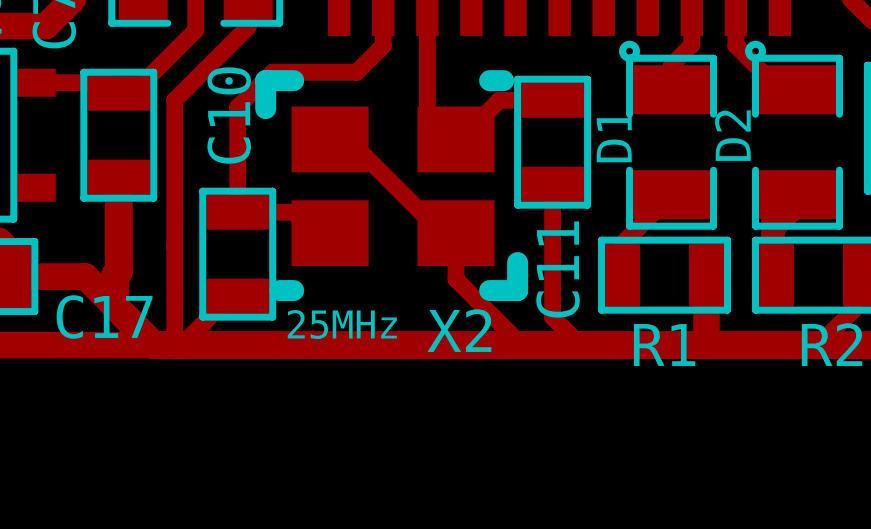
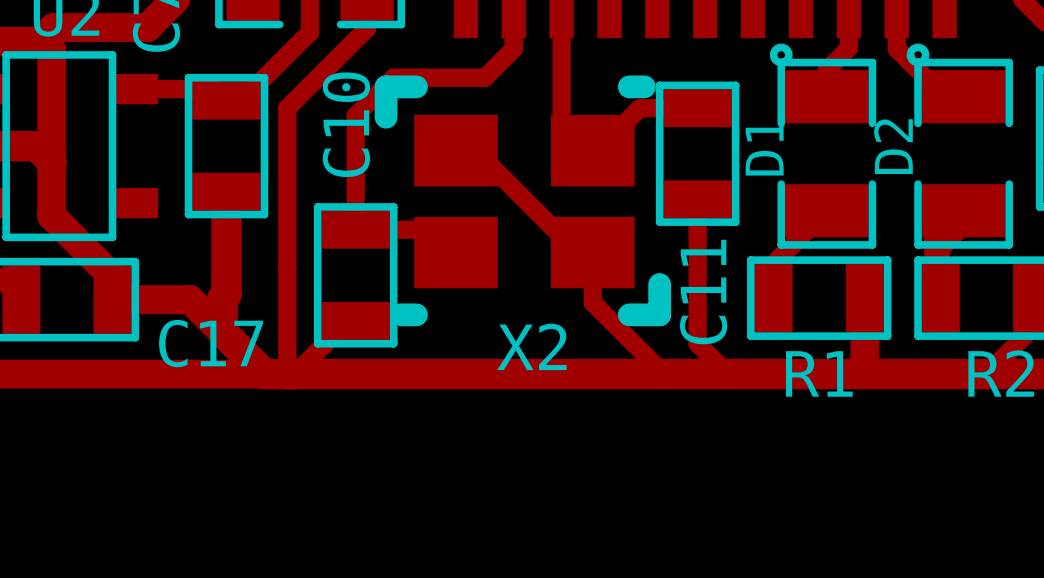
X2 value: 25MHz (342, 324) -> none
X2 name position: X2 (459, 330) -> X2 (531, 346)

